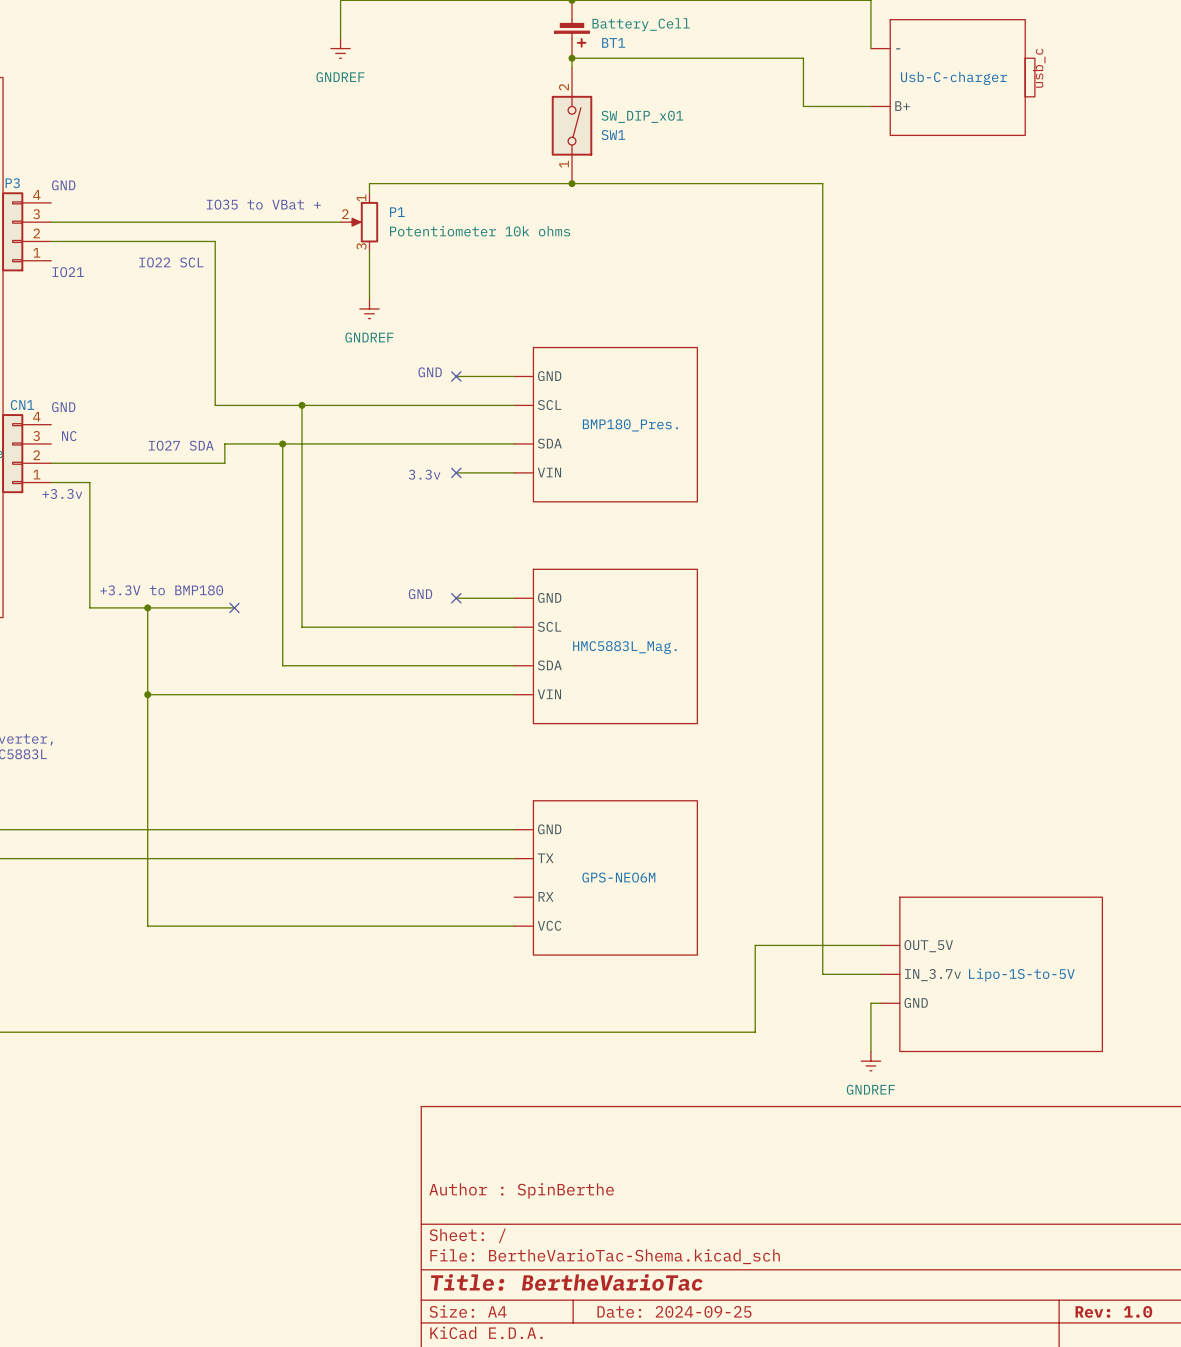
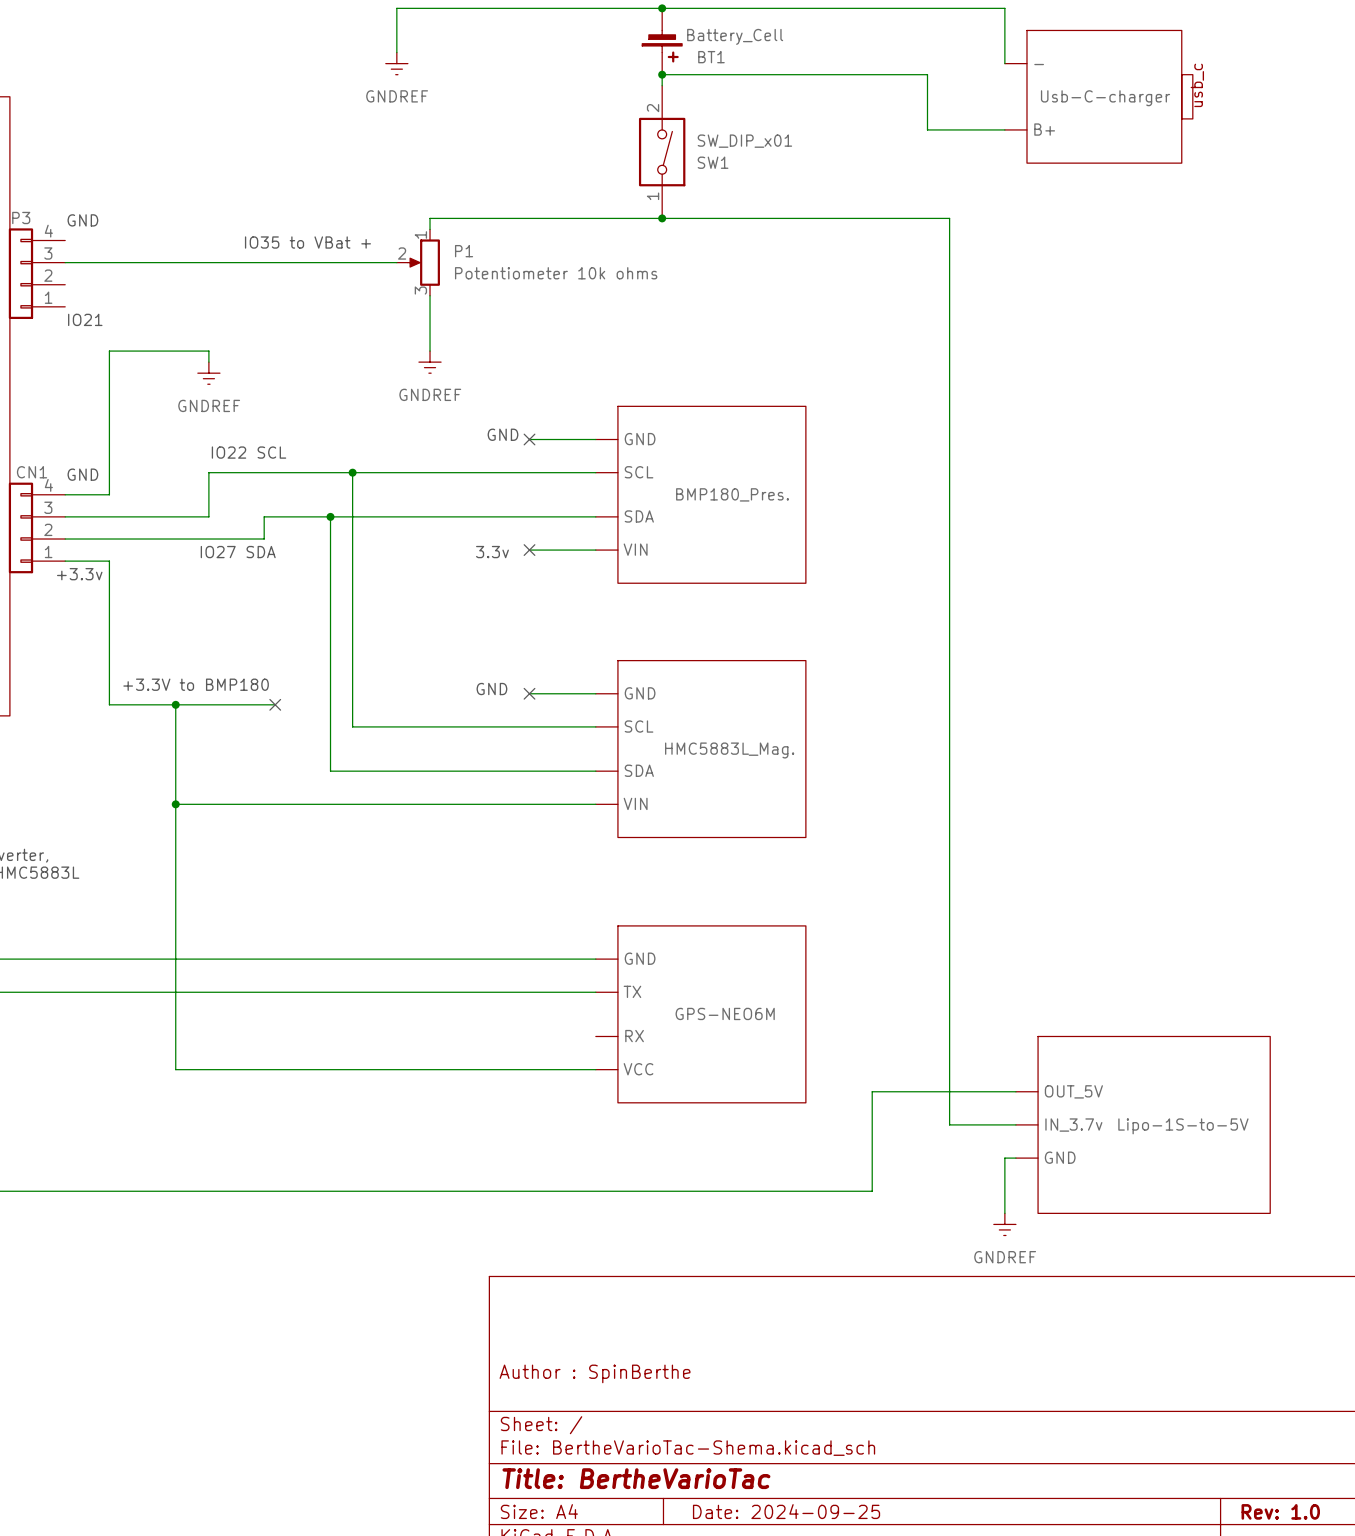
wire: (51, 241) (215, 241) (215, 405) -> (65, 516) (208, 516) (208, 472) (253, 472)
text position: IO22 SCL (171, 262) -> IO22 SCL (249, 452)
wire: none -> (208, 362) (208, 351) (109, 351) (109, 494) (65, 494)
power symbol: none -> GNDREF (208, 373)
text: NC (69, 436) -> none
text position: IO27 SDA (181, 445) -> IO27 SDA (238, 552)

